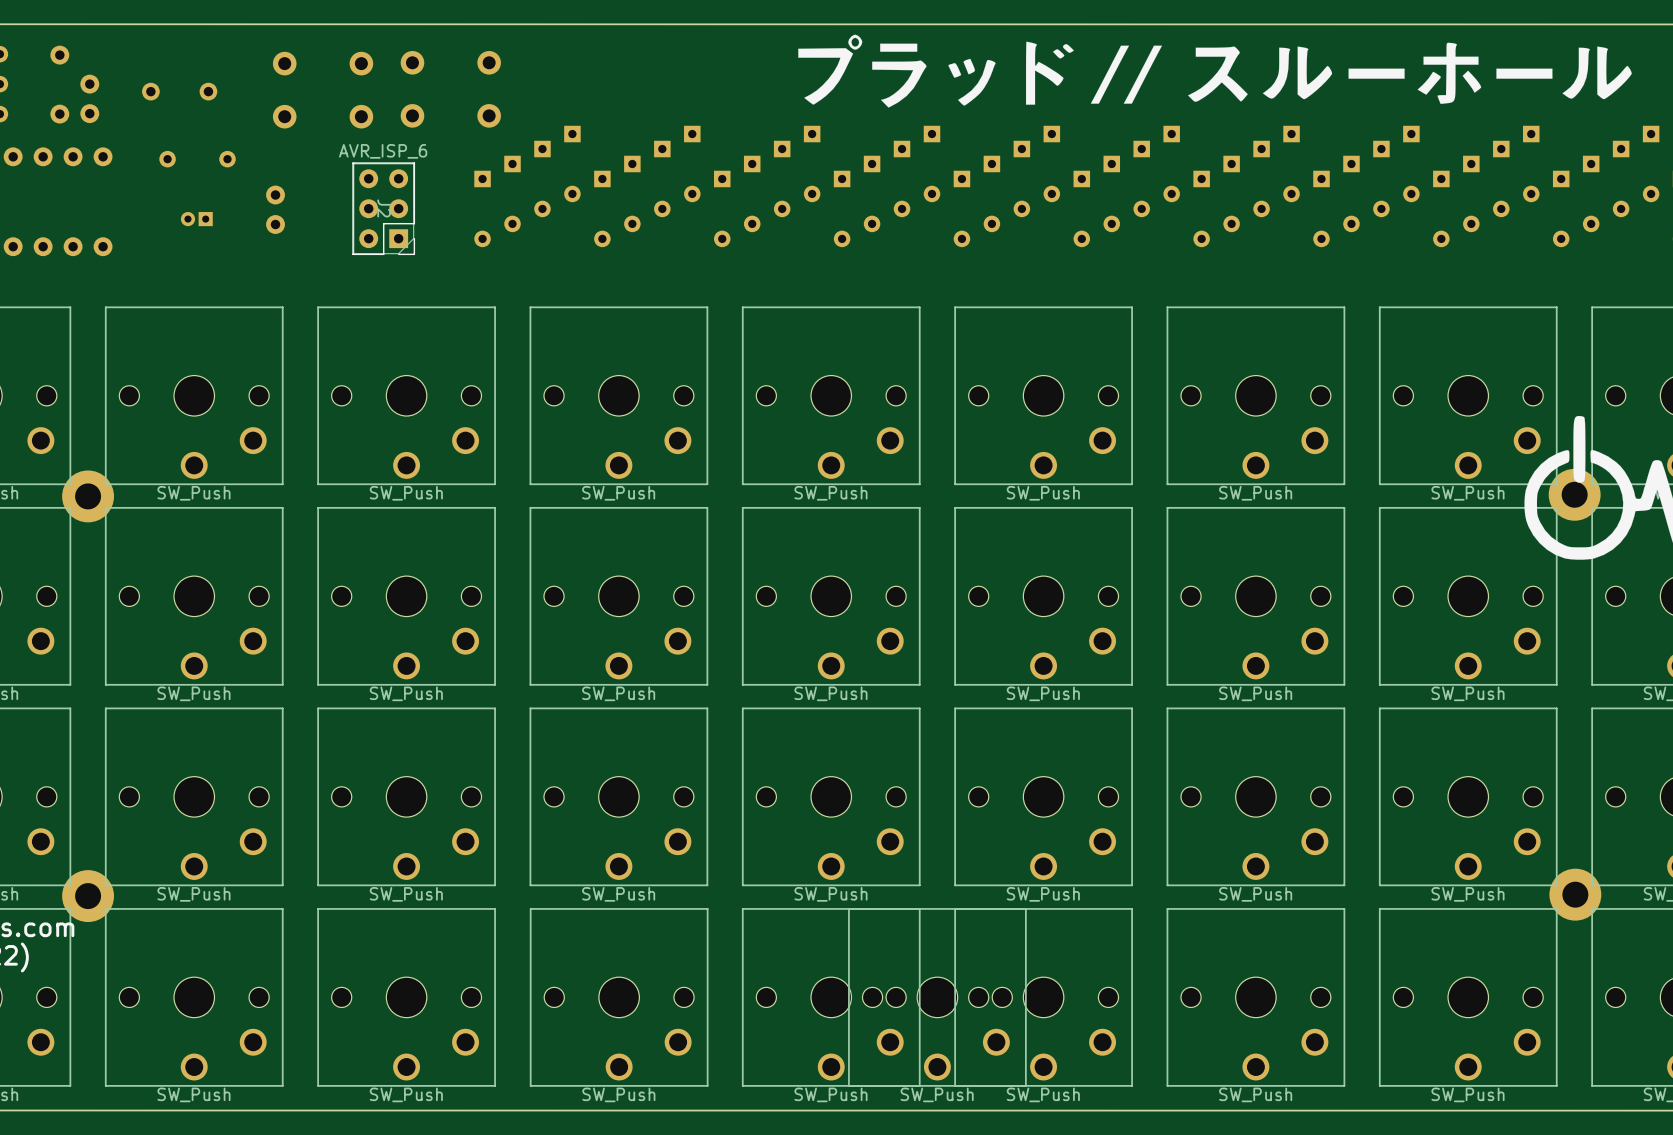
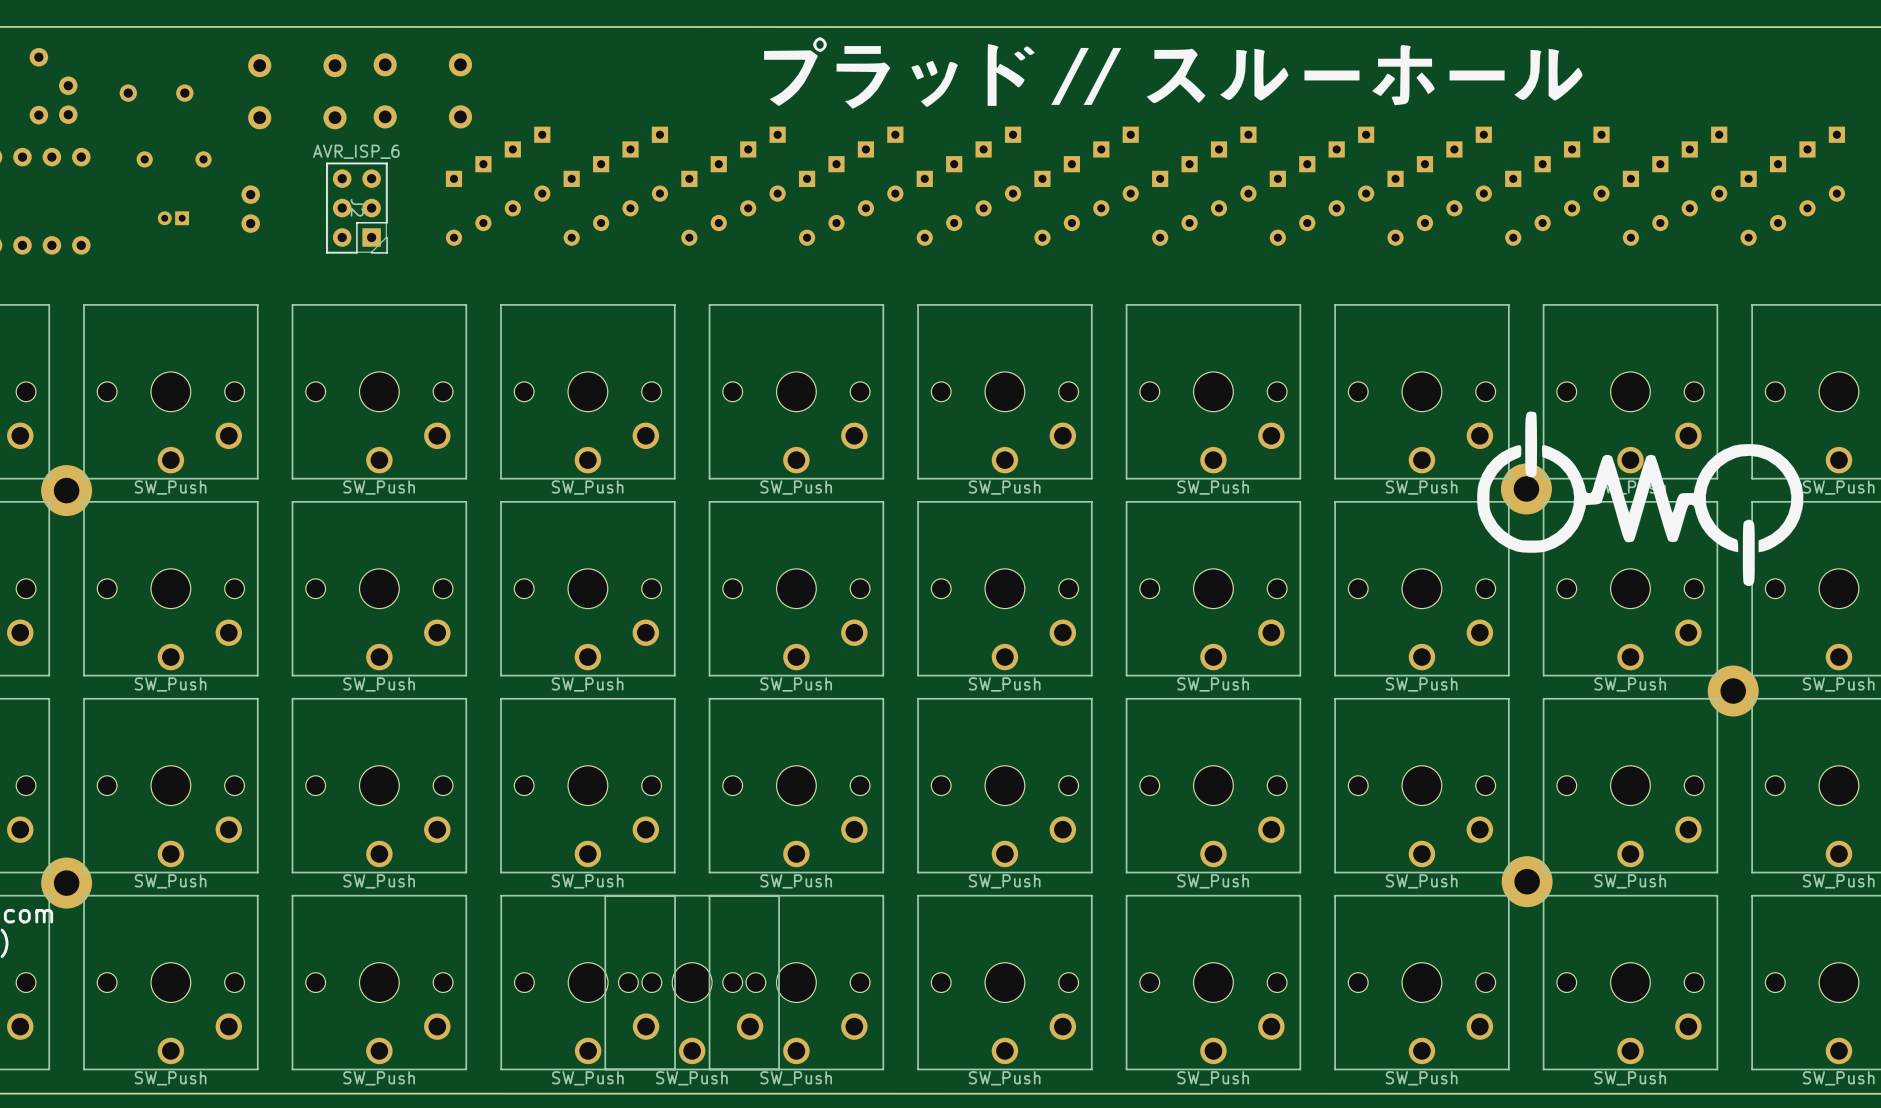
part position: (937, 997) -> (692, 982)

